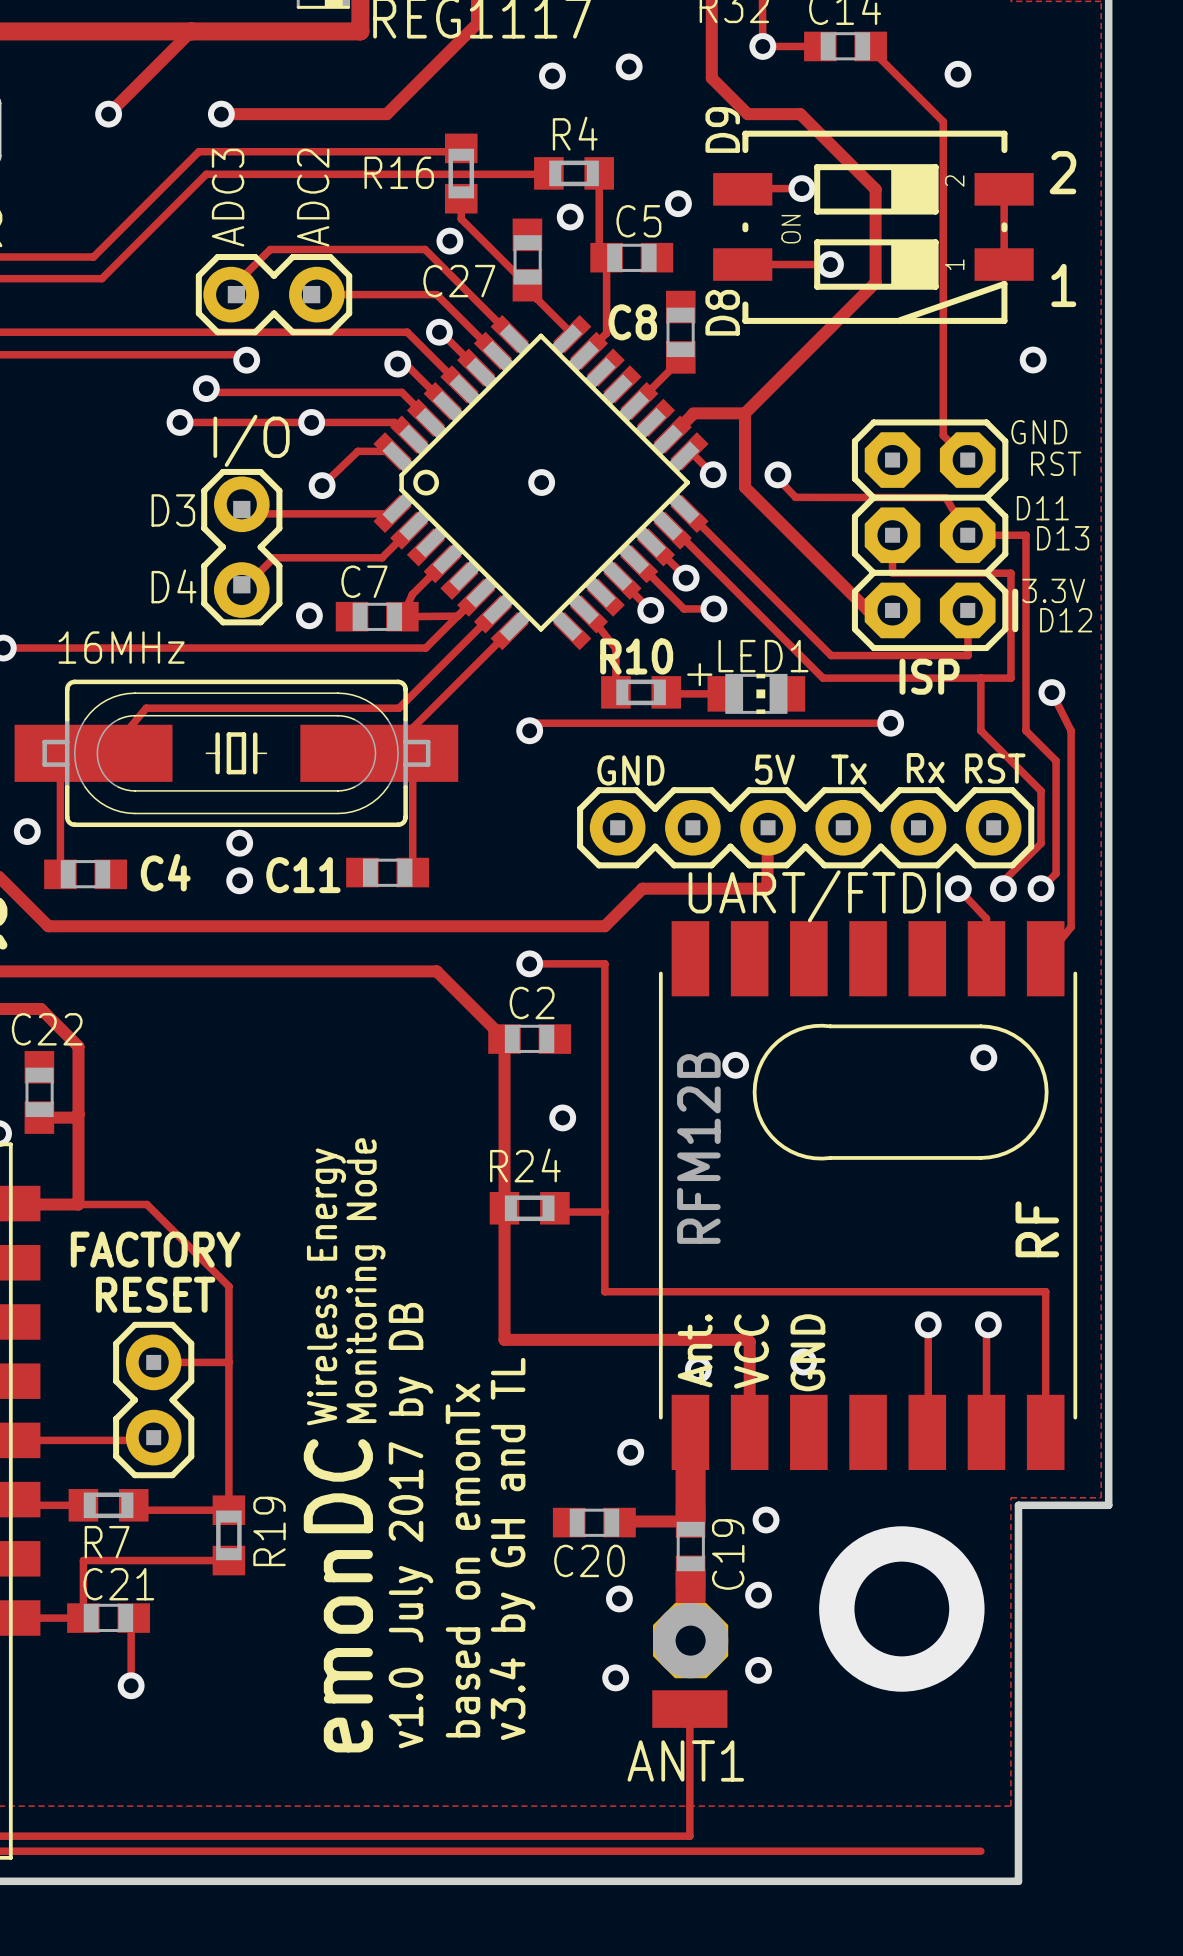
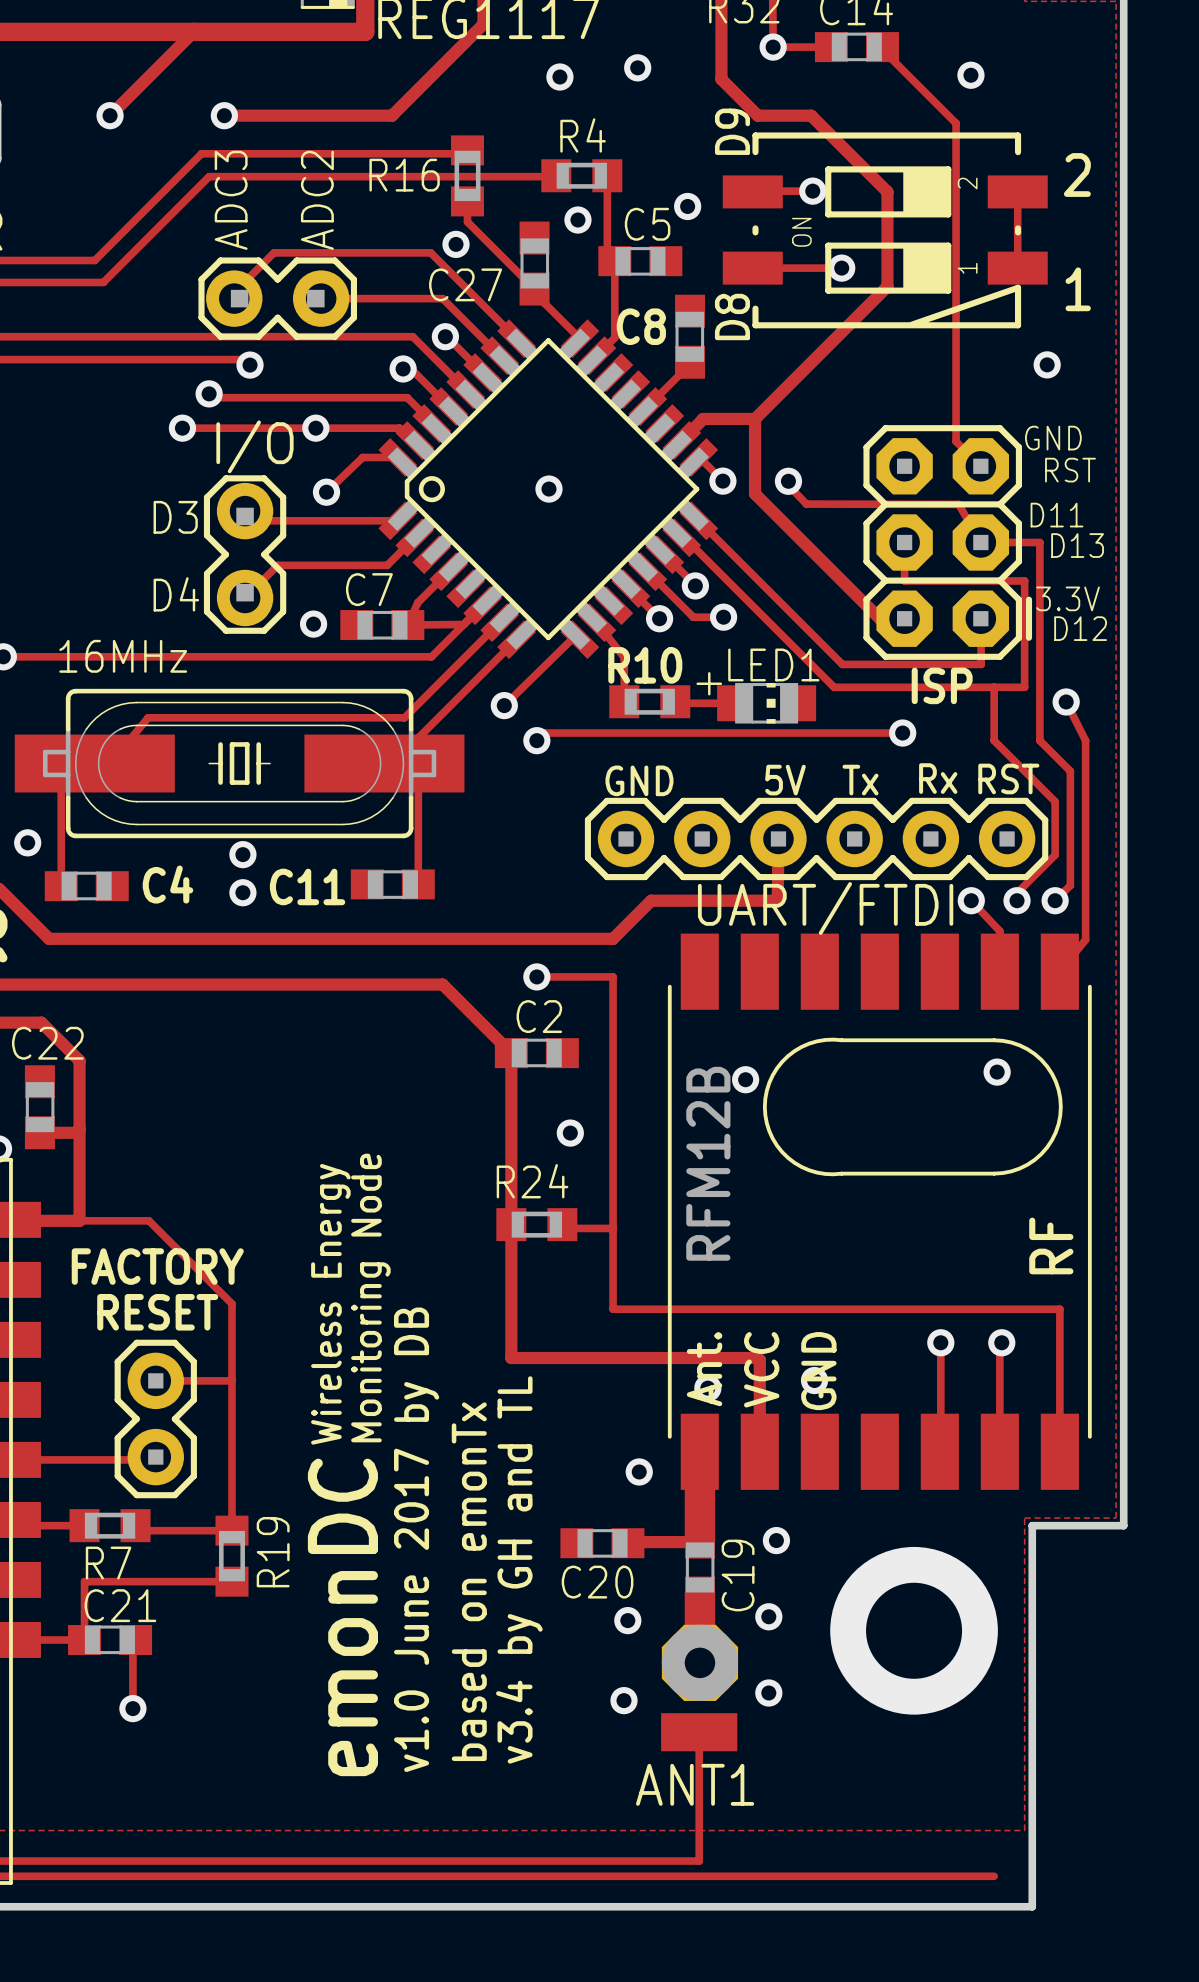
track: none -> (579, 639) (576, 639) (576, 635) (504, 705)
via: none -> (504, 705)
text: v1.0 July 2017 by DB (411, 1525) -> v1.0 June 2017 by DB (416, 1539)

